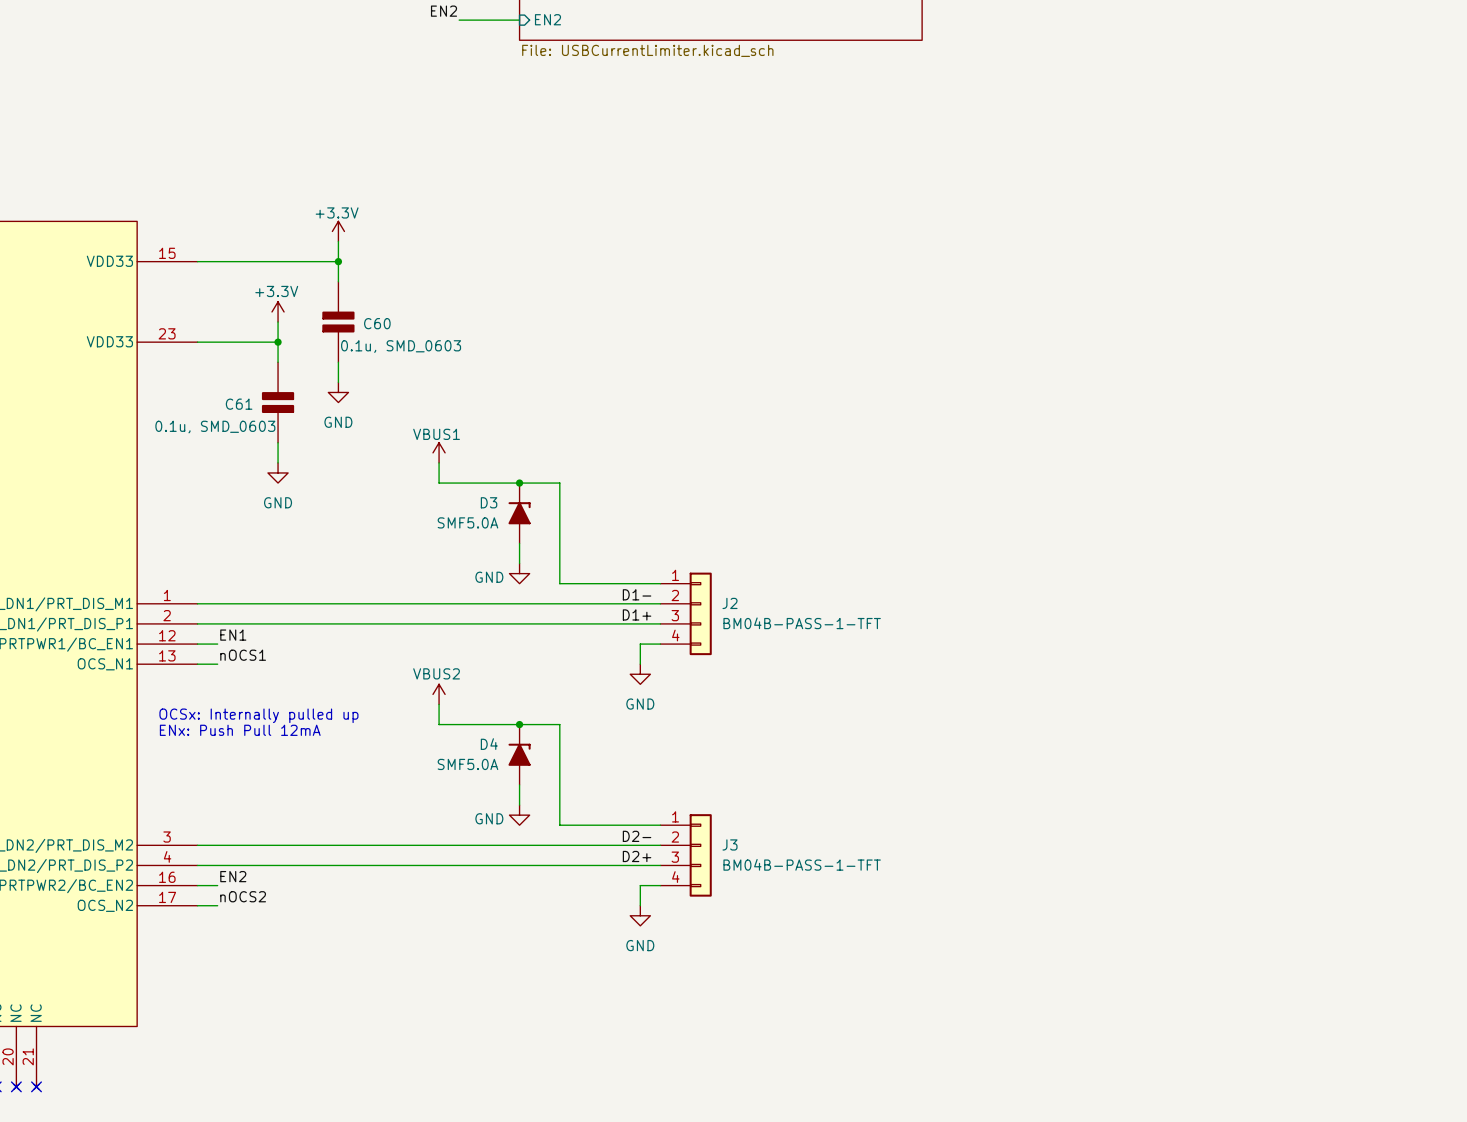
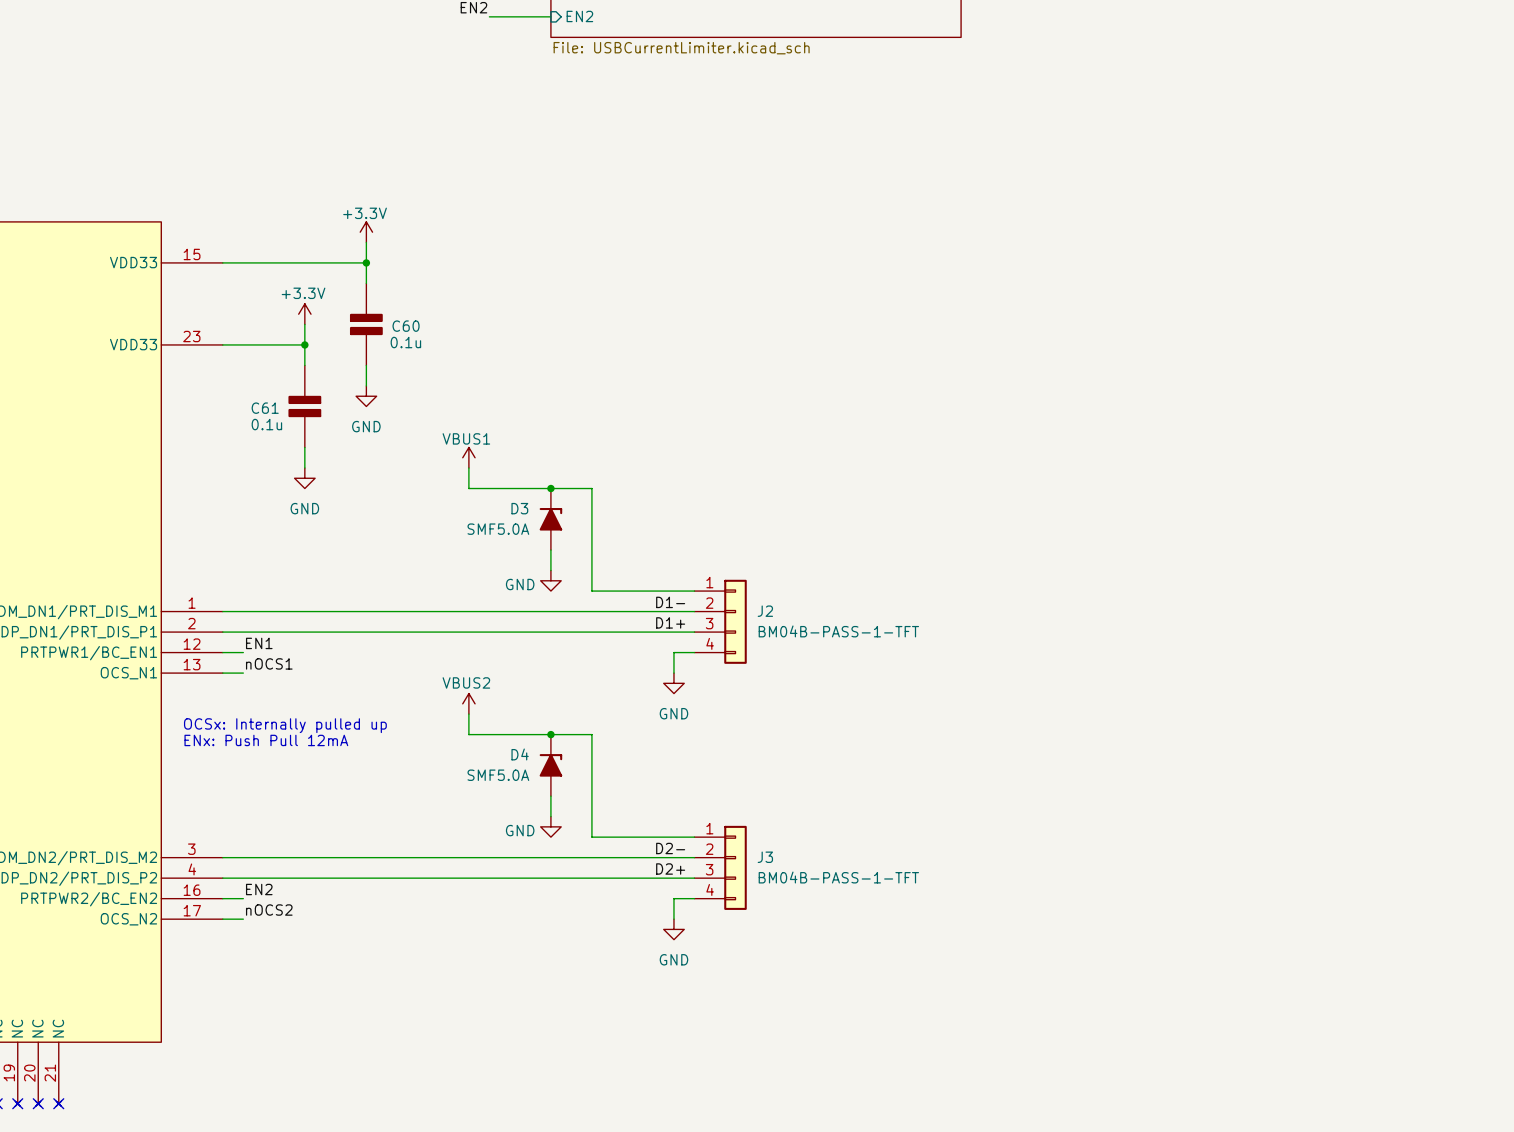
C60 value: 0.1u, SMD_0603 (401, 346) -> 0.1u (405, 342)
C61 value: 0.1u, SMD_0603 (215, 427) -> 0.1u (266, 424)

